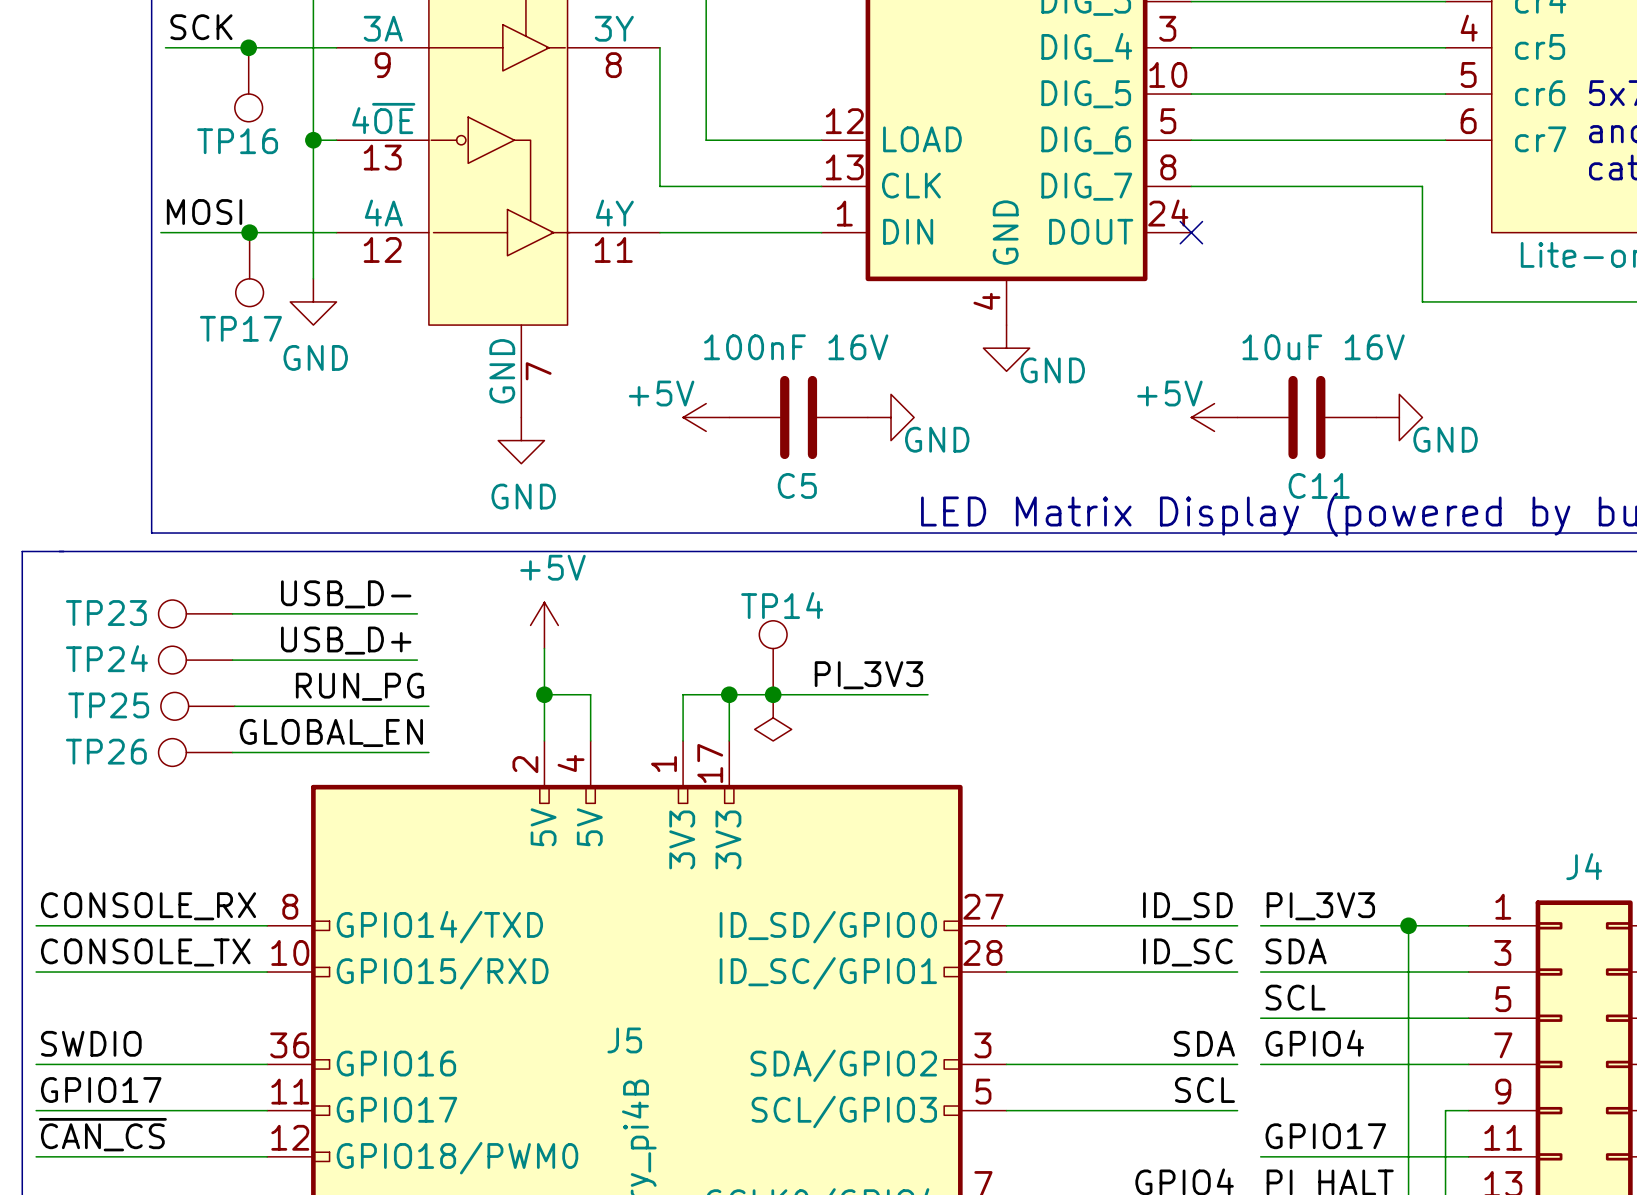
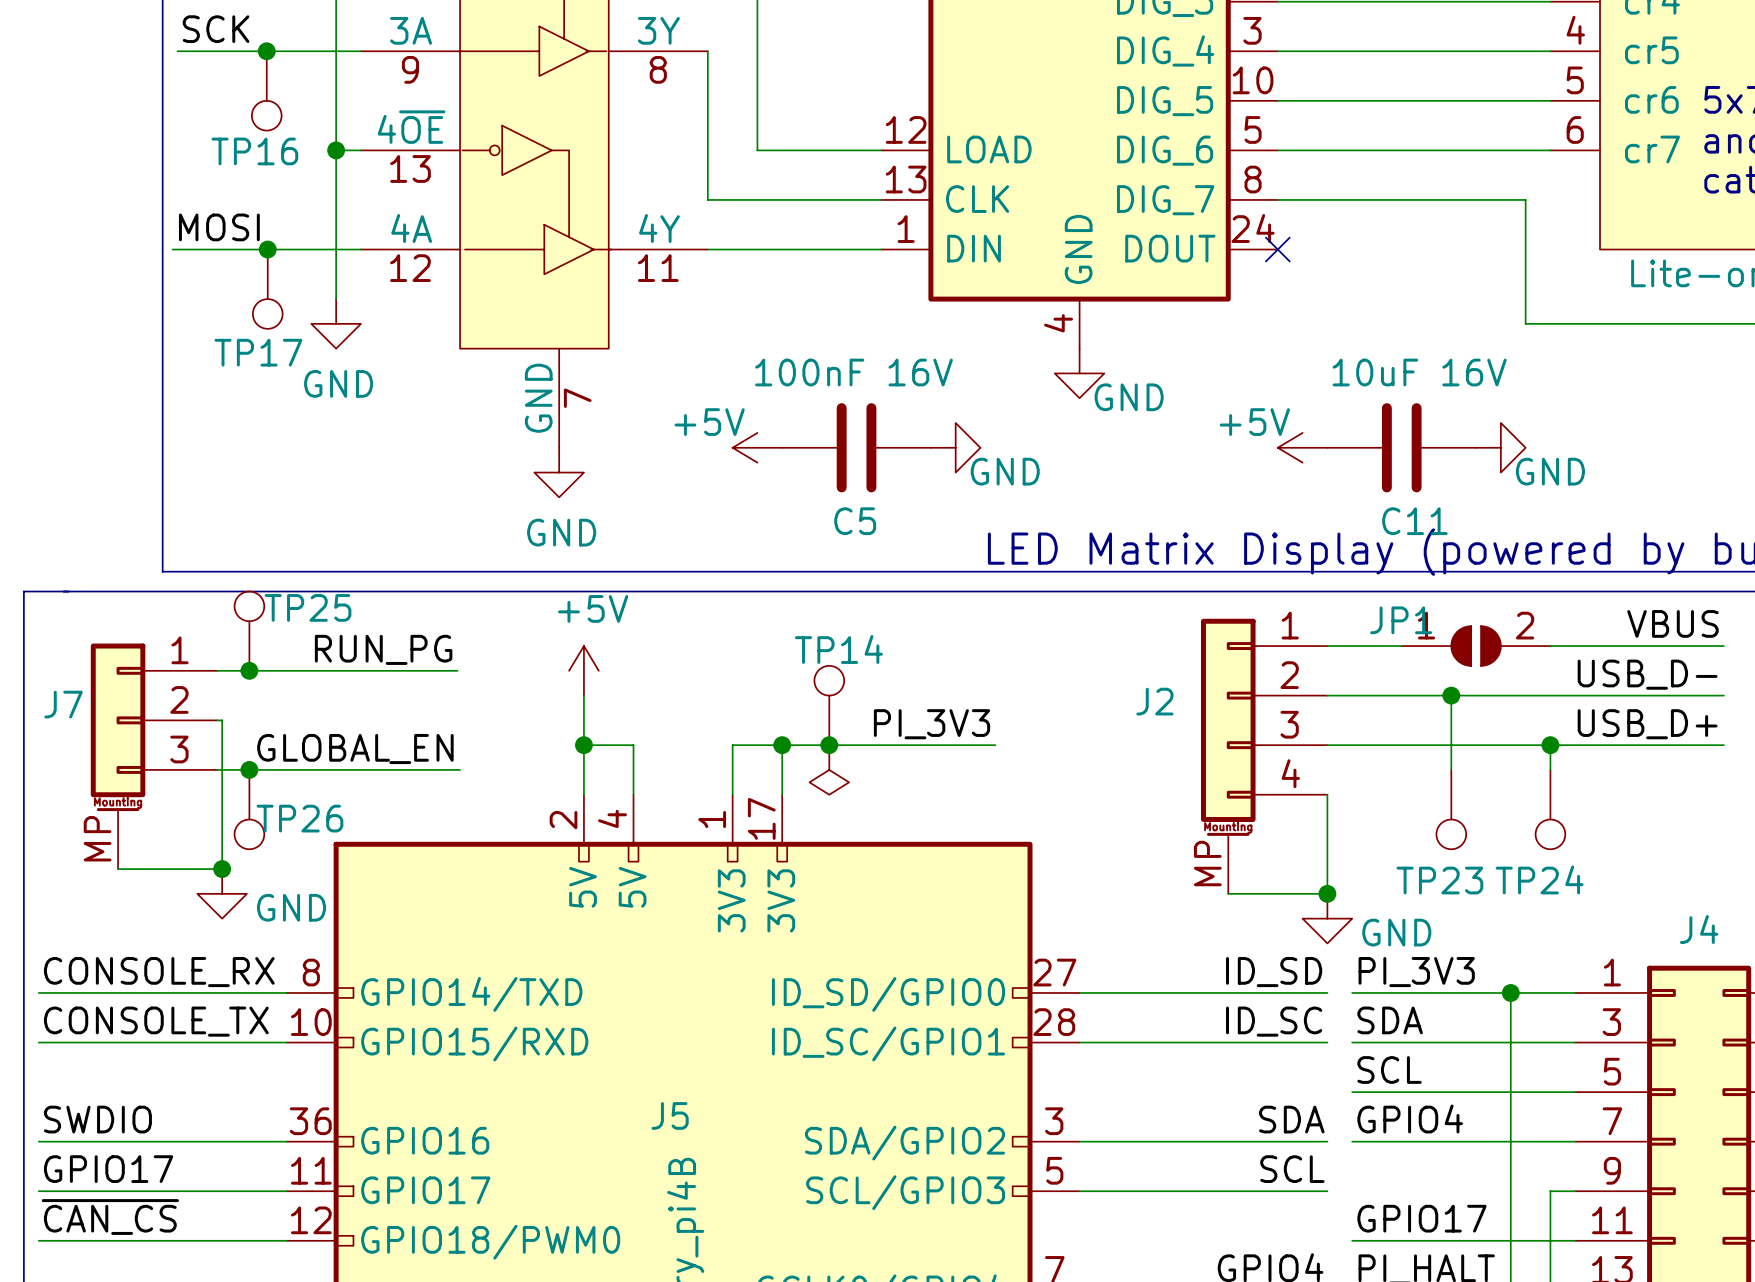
label: none -> VBUS (1672, 623)
label: USB_D- (346, 594) -> none
wire: none -> (1327, 646) (1401, 646)
JP1: none -> (1476, 646)
wire: none -> (1550, 646) (1723, 646)
TP23 rotation: 0° (172, 613) -> 90° counterclockwise (1451, 834)
TP23 position: (195, 613) -> (1451, 809)
wire: (232, 613) (417, 613) -> none
wire: none -> (217, 670) (457, 670)
junction: none -> (249, 670)
label: none -> USB_D- (1647, 674)
label: USB_D+ (346, 640) -> none
wire: none -> (1327, 695) (1723, 695)
wire: none -> (1451, 695) (1451, 769)
junction: none -> (1451, 695)
TP24 rotation: 0° (172, 660) -> 90° counterclockwise (1550, 834)
TP24 position: (195, 660) -> (1550, 809)
wire: (232, 660) (417, 660) -> none
wire: none -> (217, 720) (222, 720) (222, 869) (118, 869)
label: none -> USB_D+ (1647, 724)
label position: RUN_PG (359, 686) -> RUN_PG (383, 649)
wire: none -> (1327, 745) (1723, 745)
wire: none -> (1550, 745) (1550, 769)
junction: none -> (1550, 745)
TP25 name position: TP25 (108, 705) -> TP25 (307, 607)
J7: none -> (153, 756)
J2: none -> (1264, 756)
TP25 rotation: 0° (174, 706) -> 90° clockwise (249, 606)
TP25 position: (197, 706) -> (249, 631)
wire: (234, 706) (428, 706) -> none
wire: none -> (217, 769) (460, 769)
junction: none -> (249, 769)
label position: GLOBAL_EN (331, 732) -> GLOBAL_EN (355, 749)
wire: none -> (1327, 794) (1327, 893) (1228, 893)
TP26 name position: TP26 (106, 751) -> TP26 (299, 818)
TP26 rotation: 0° (172, 752) -> 90° counterclockwise (249, 834)
wire: (232, 752) (428, 752) -> none
junction: none -> (222, 869)
power symbol: none -> GND (222, 893)
junction: none -> (1327, 893)
power symbol: none -> GND (1327, 918)

